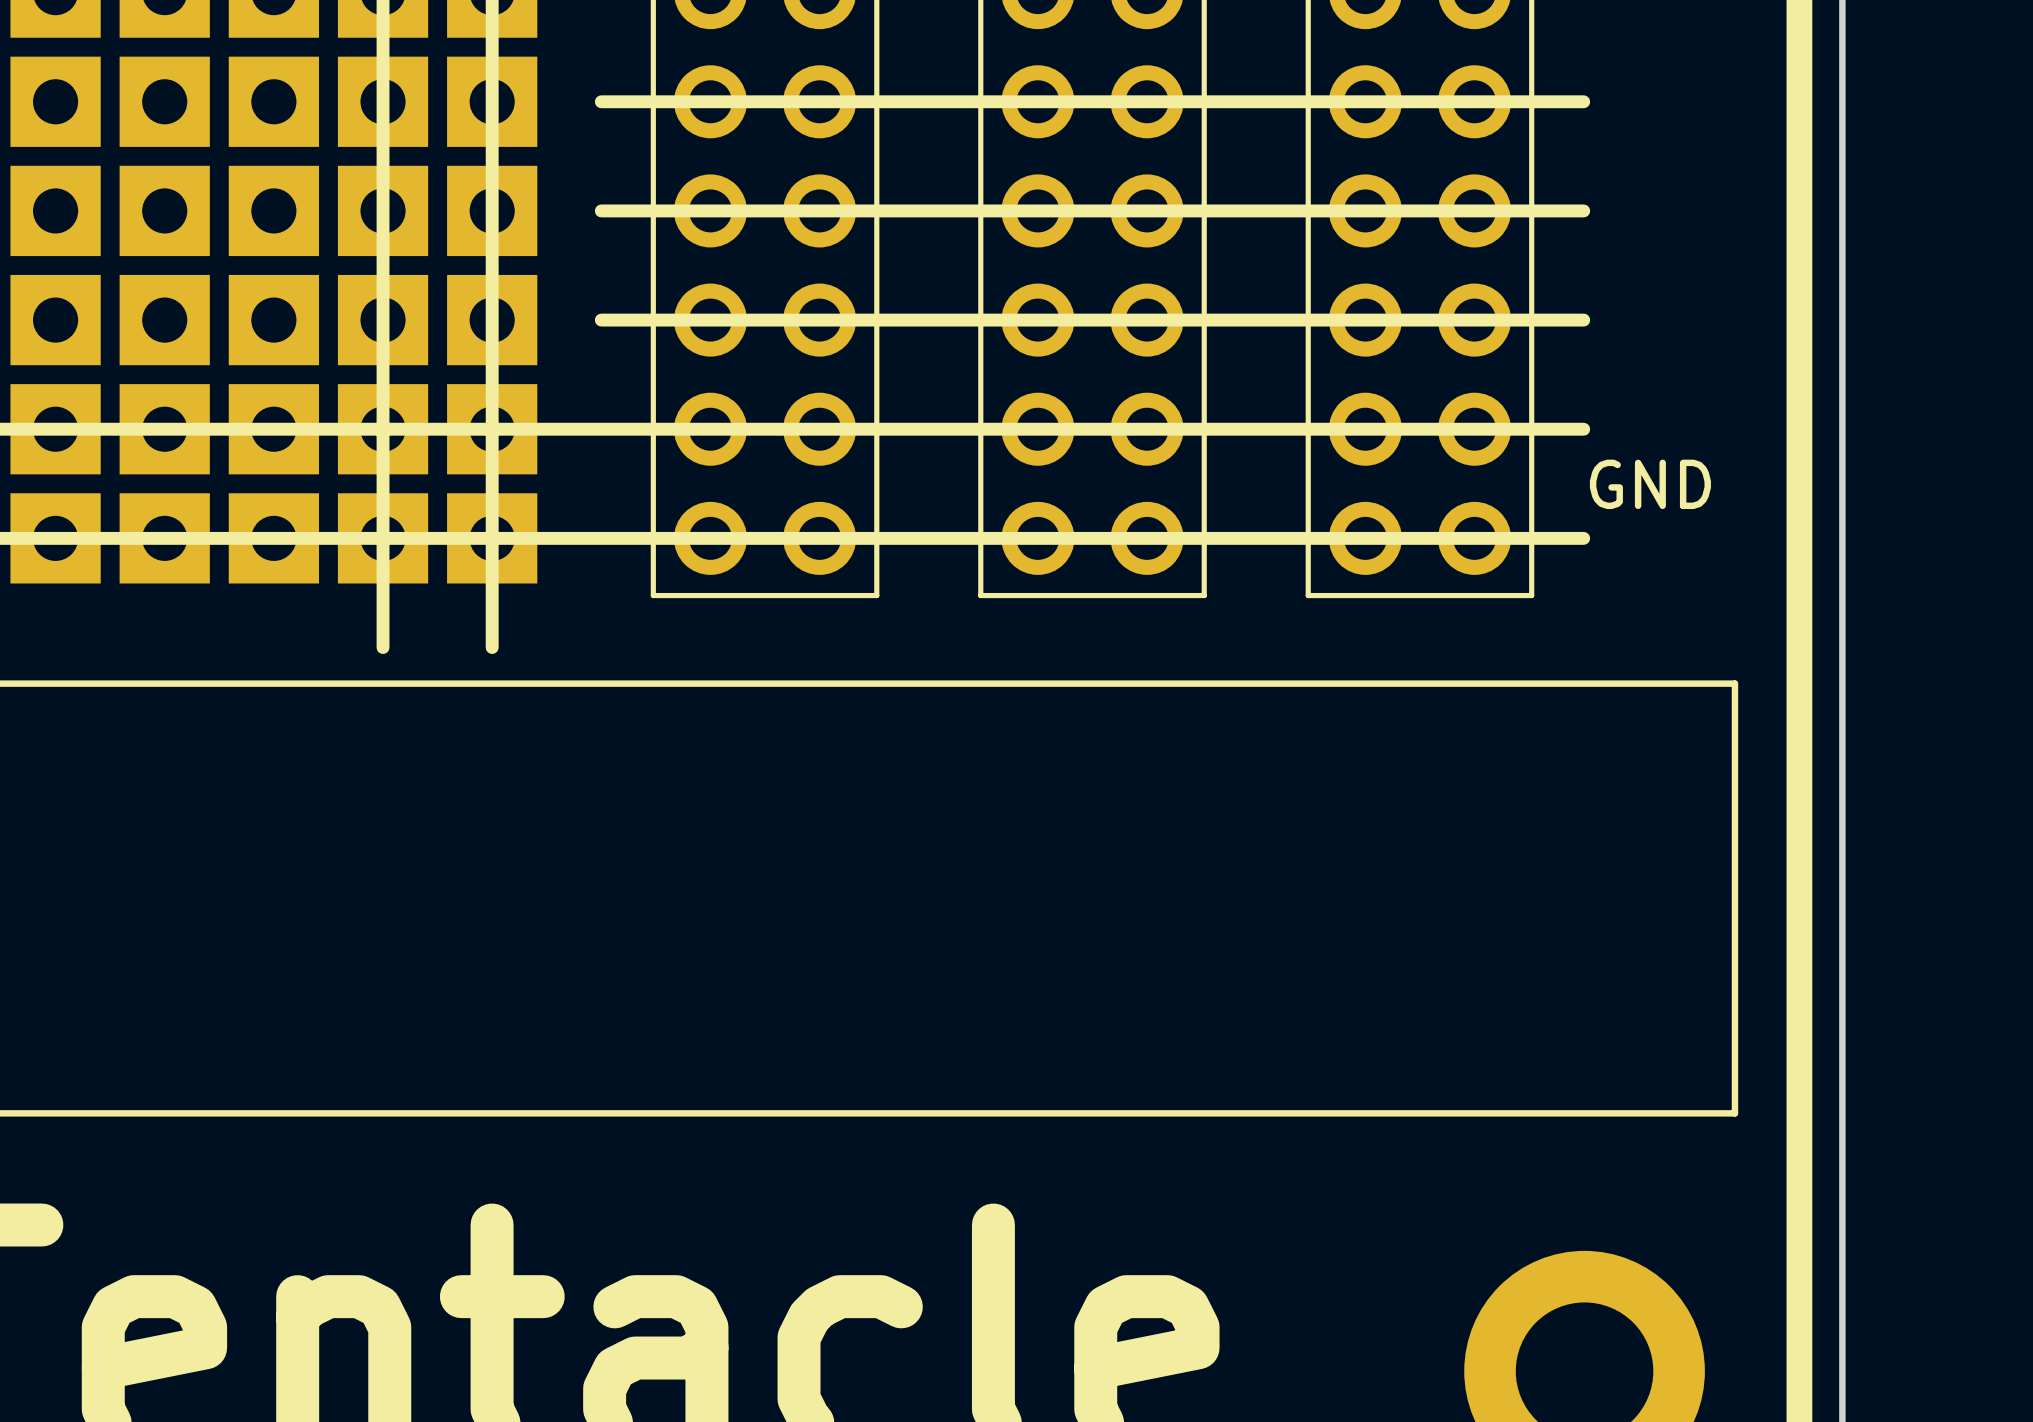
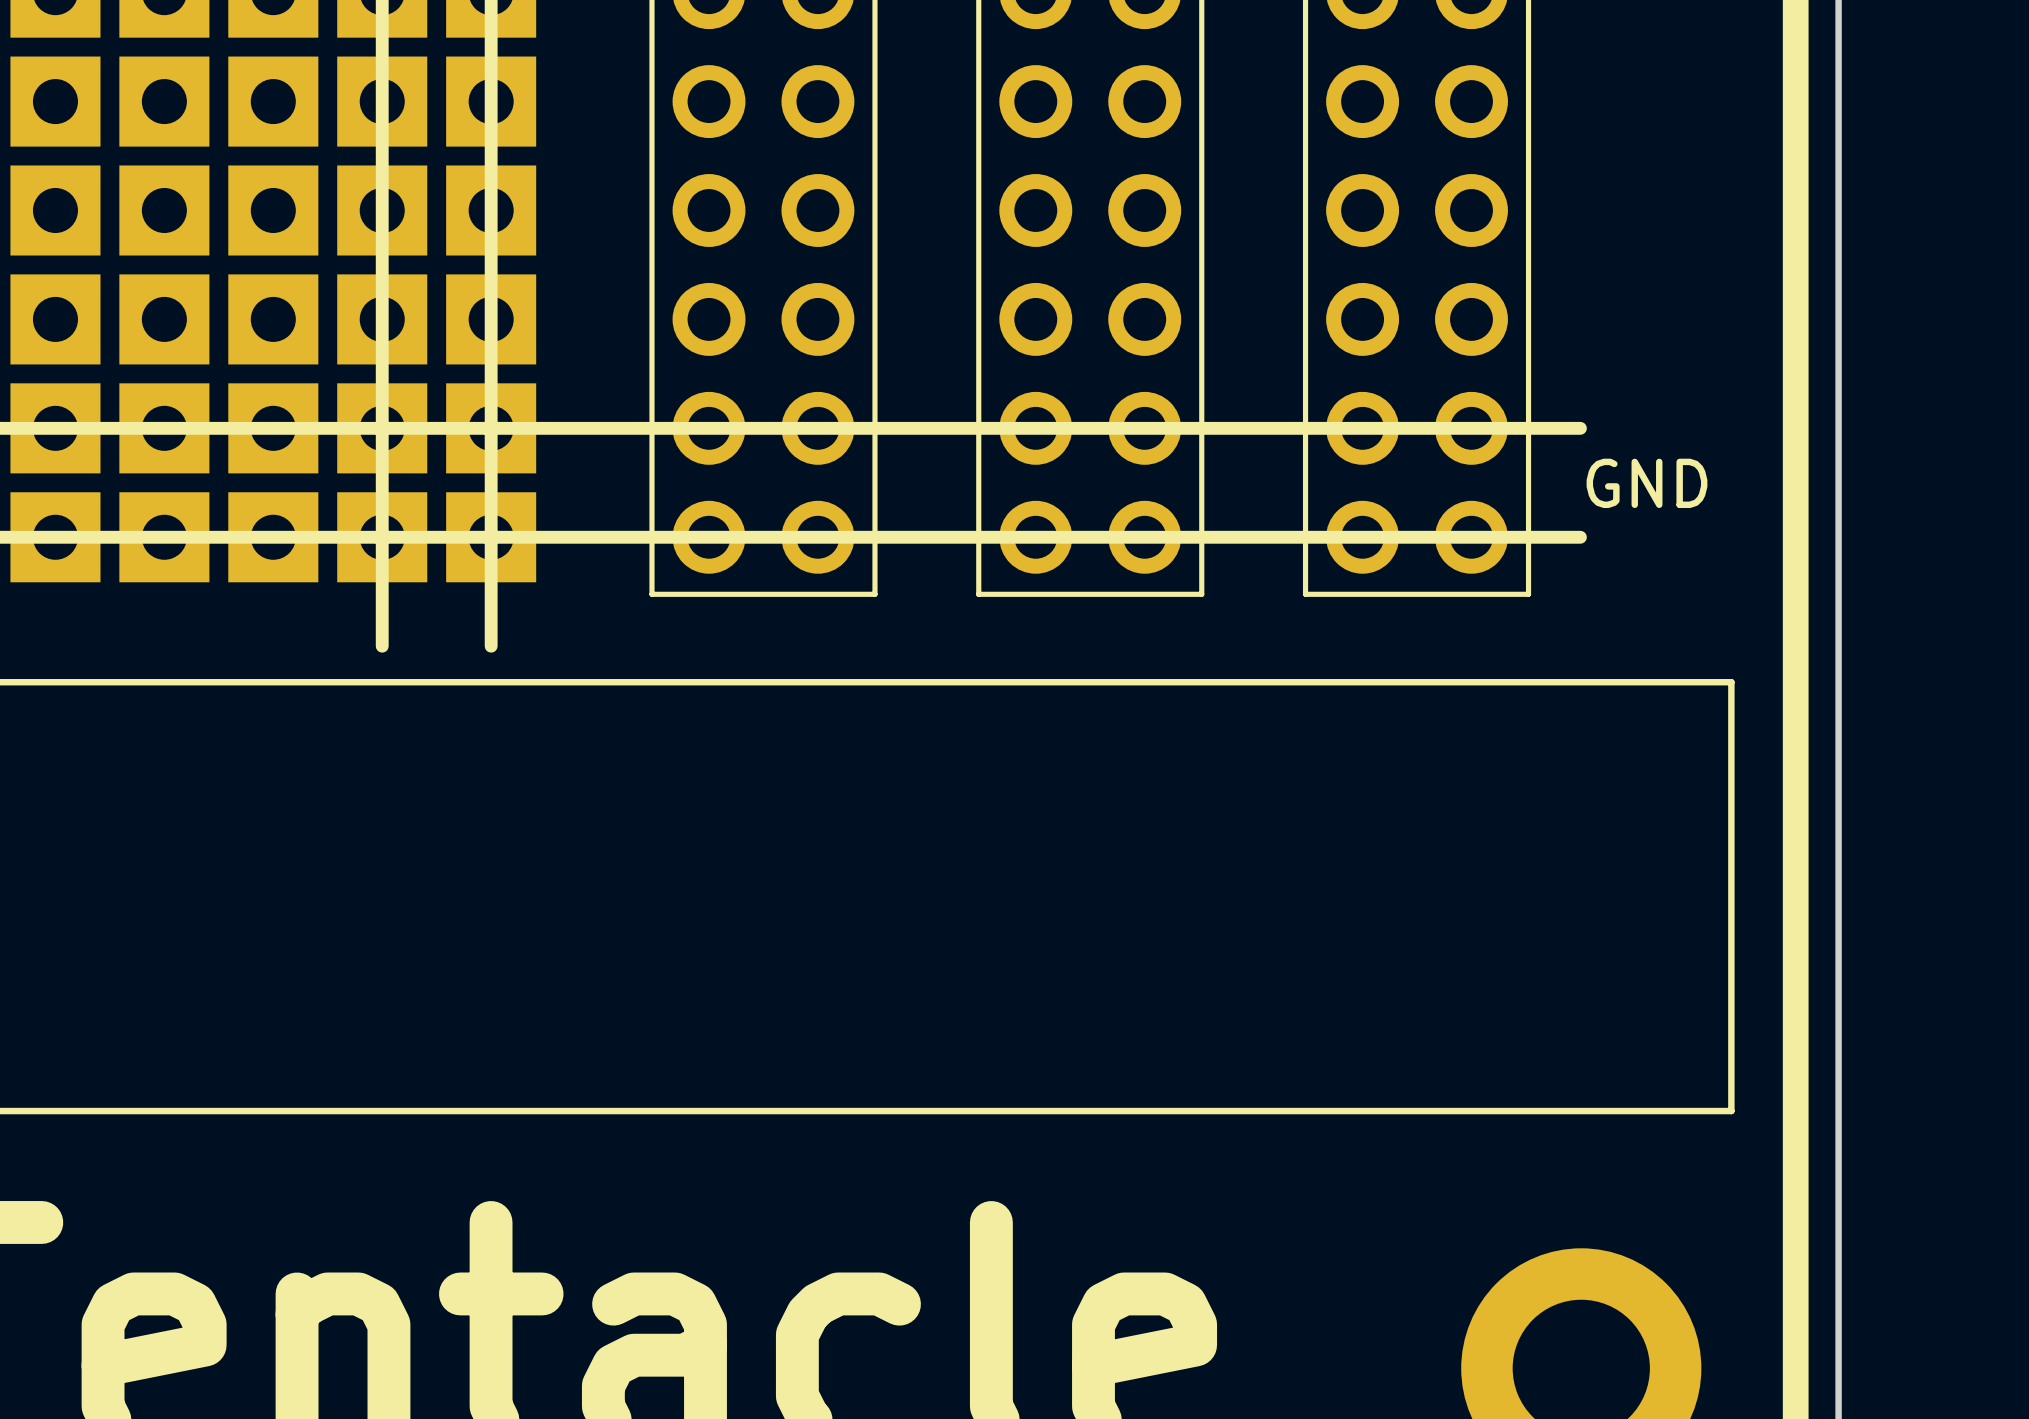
line: (601, 101) (1583, 101) -> none
line: (601, 210) (1583, 210) -> none
line: (601, 320) (1583, 320) -> none

